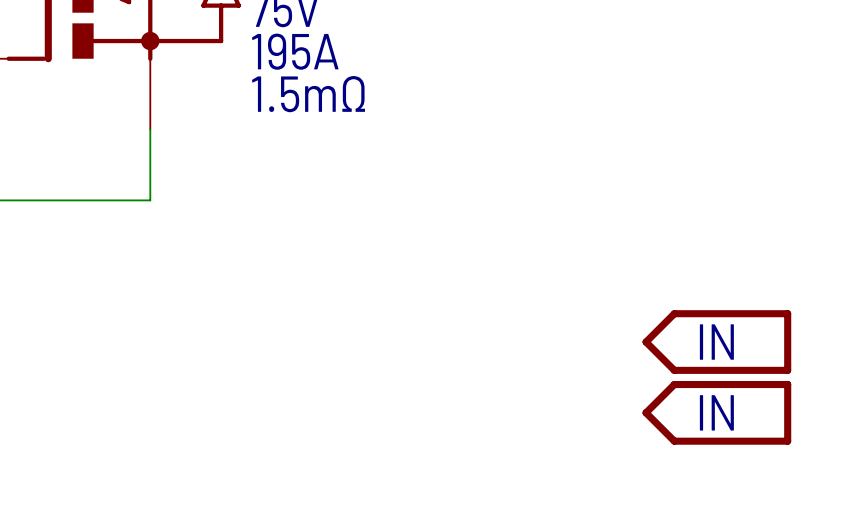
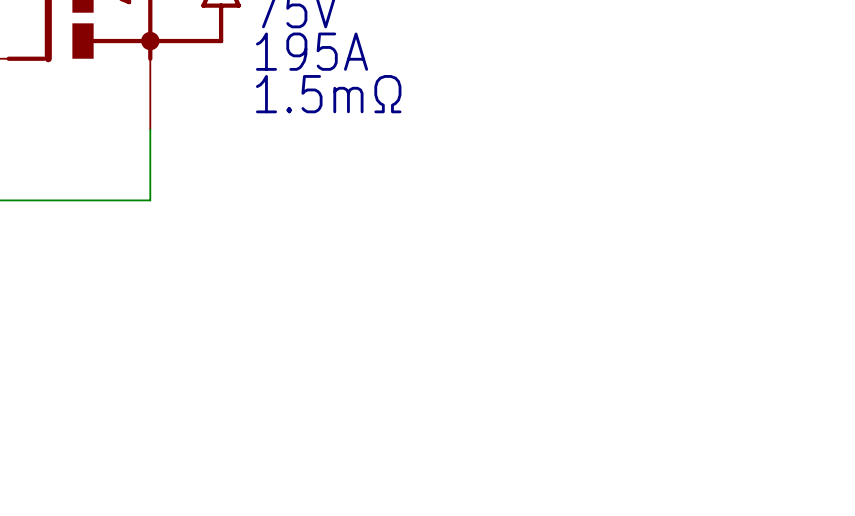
part: (716, 342) -> none
part: (716, 412) -> none

